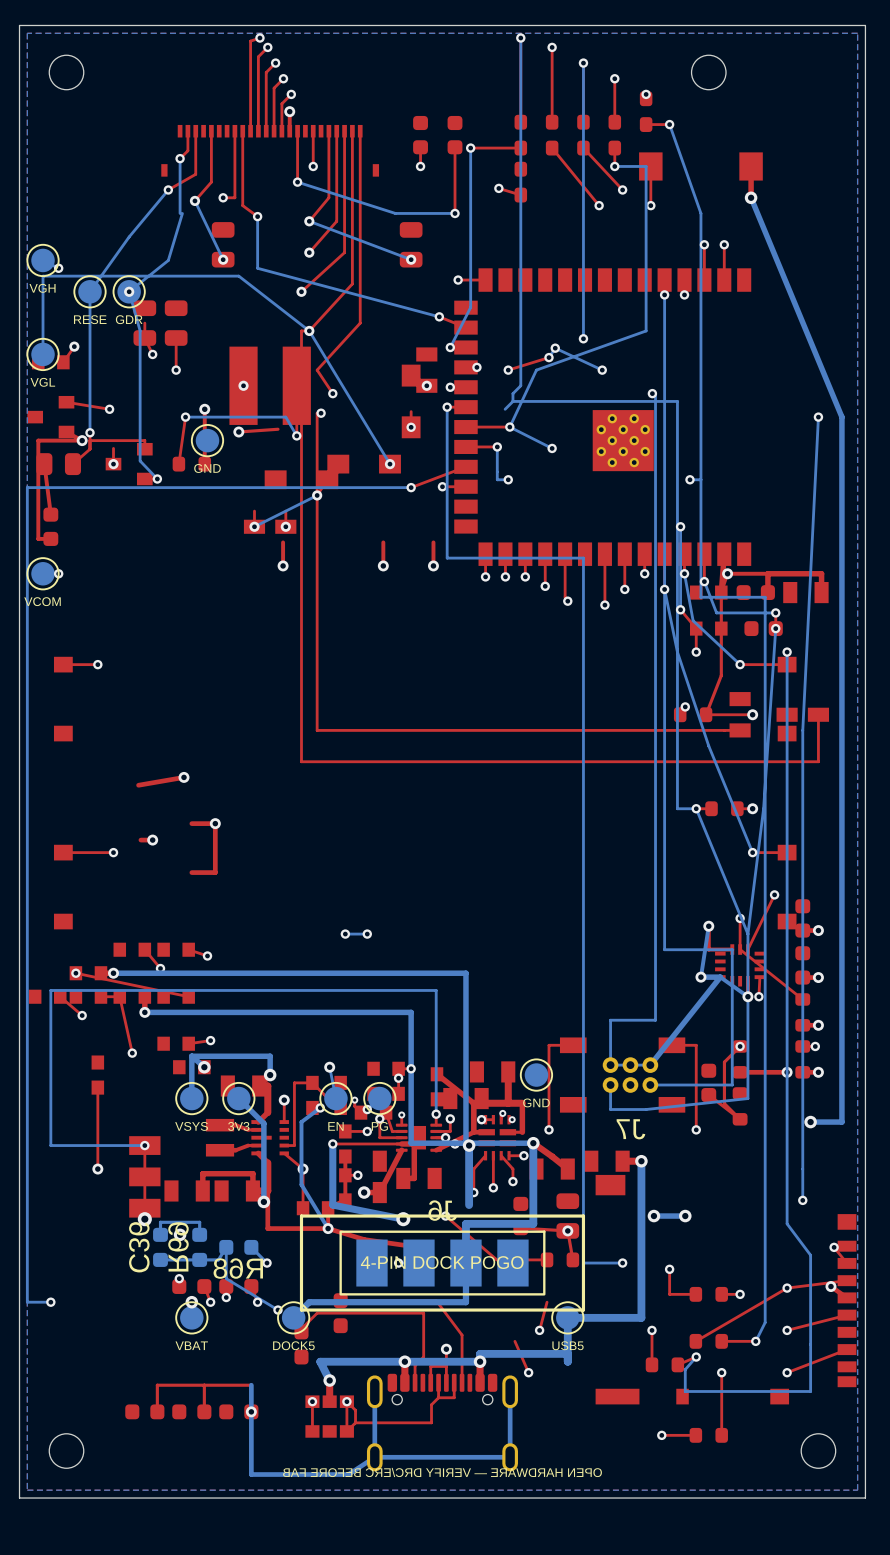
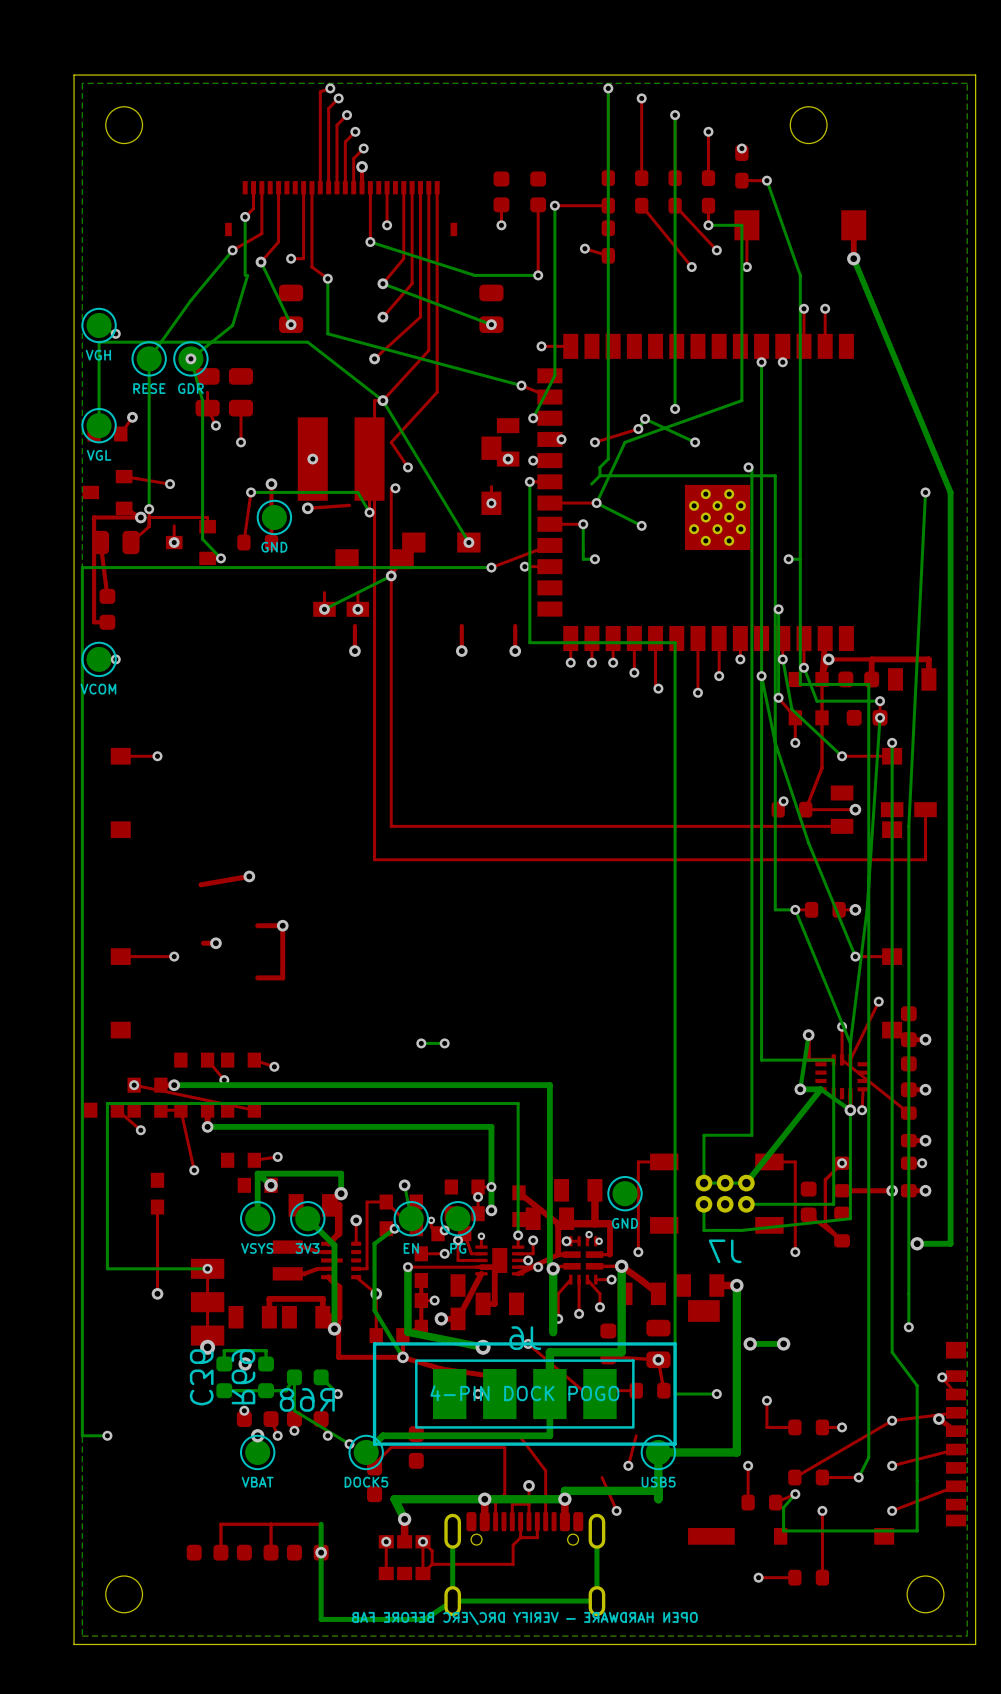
bottom track: (411, 1090) (411, 1143) (533, 1143) -> none
via: none -> (491, 1210)

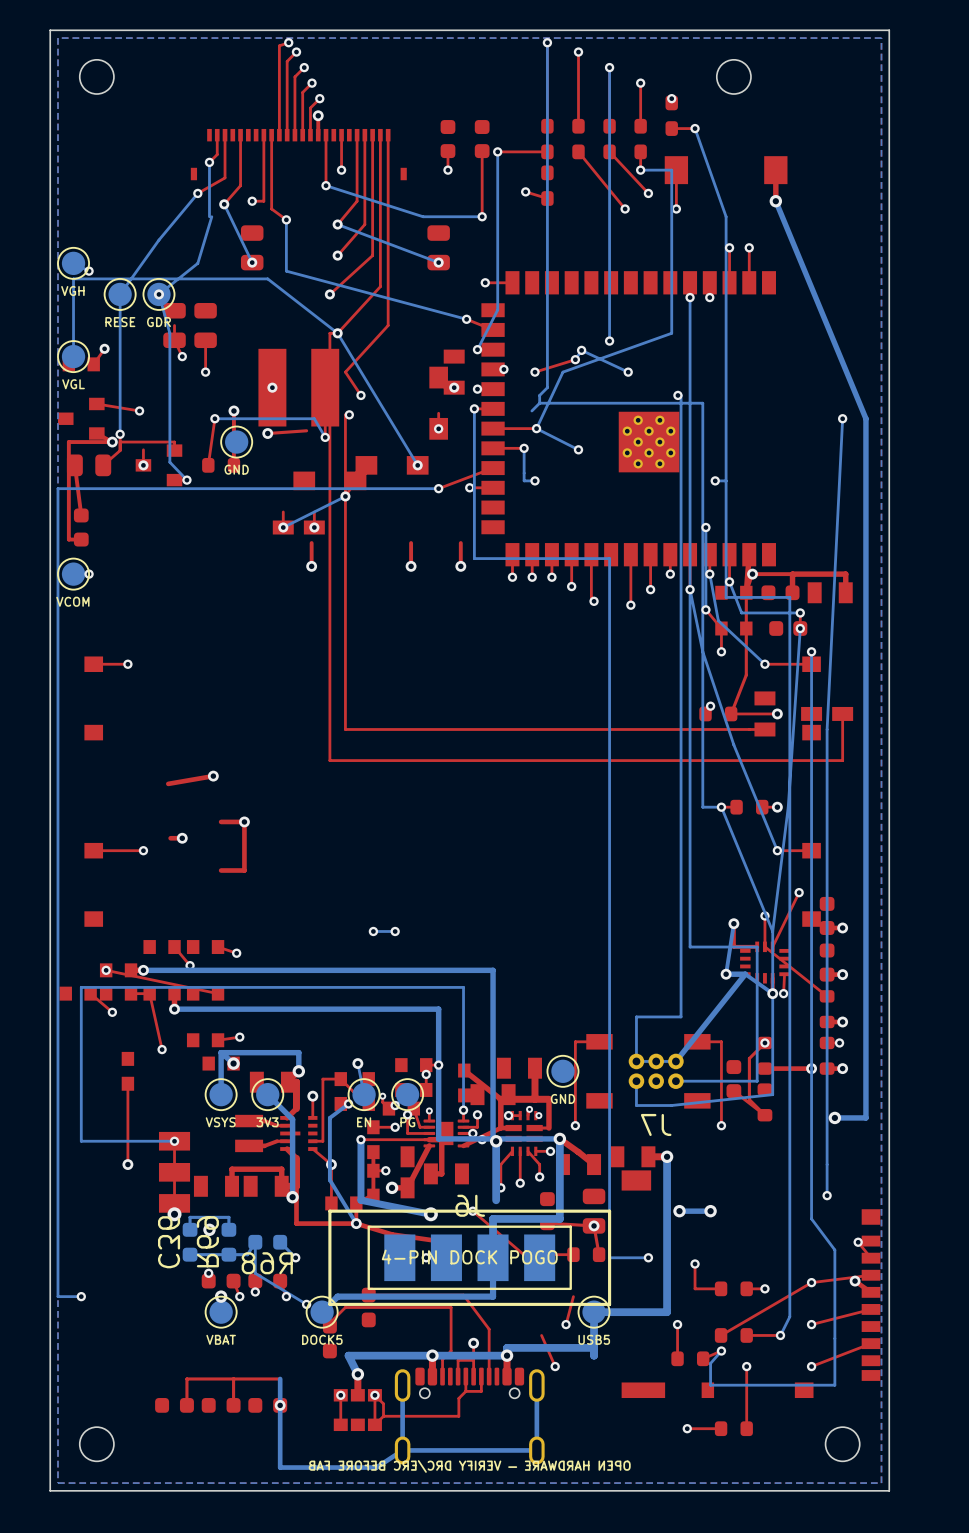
bottom track: none -> (438, 1086) (438, 1138) (559, 1138)
via: (491, 1210) -> none

